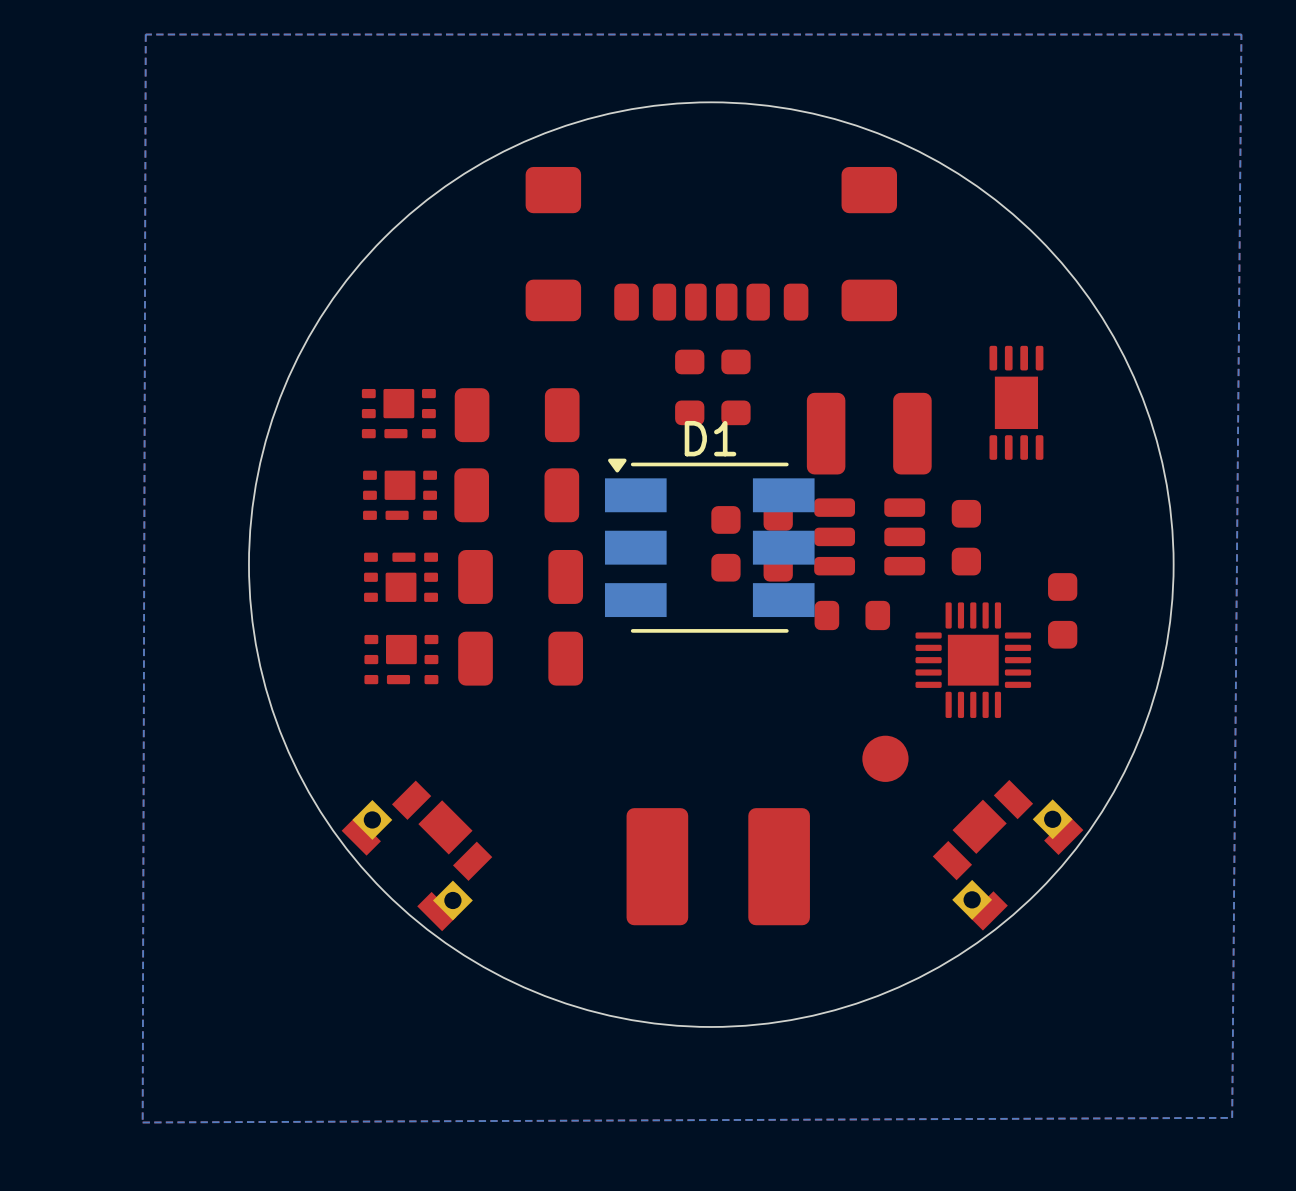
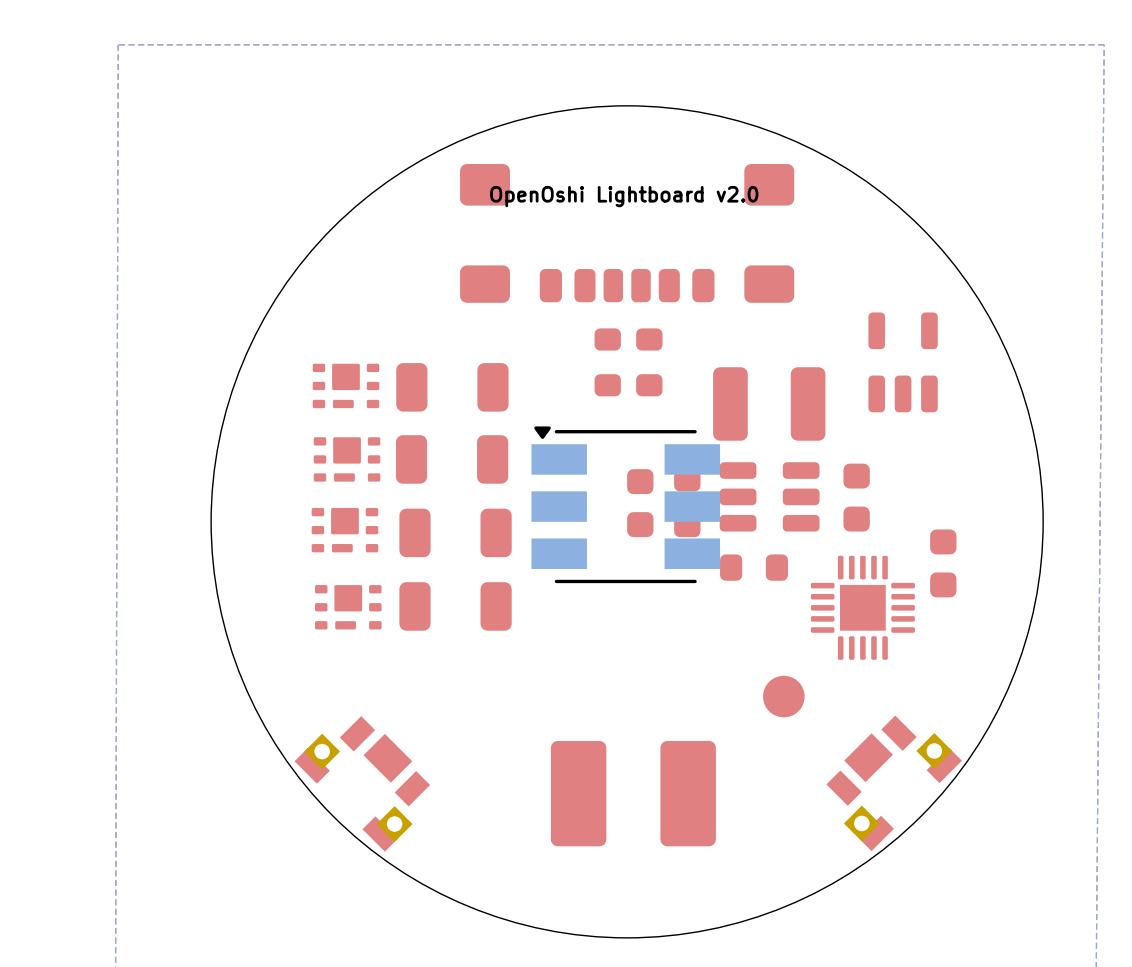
text: none -> OpenOshi Lightboard v2.0 (624, 196)
part footprint: [989, 345, 1044, 460] -> [868, 312, 938, 413]
D1 name: D1 (710, 438) -> none
part rotation: 0° (401, 577) -> 180° (344, 530)

